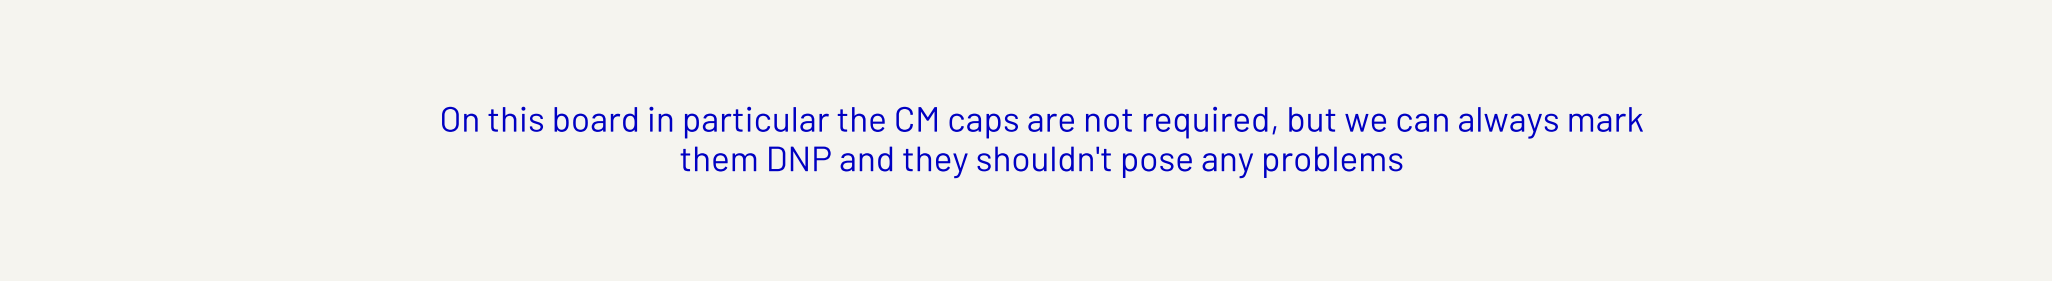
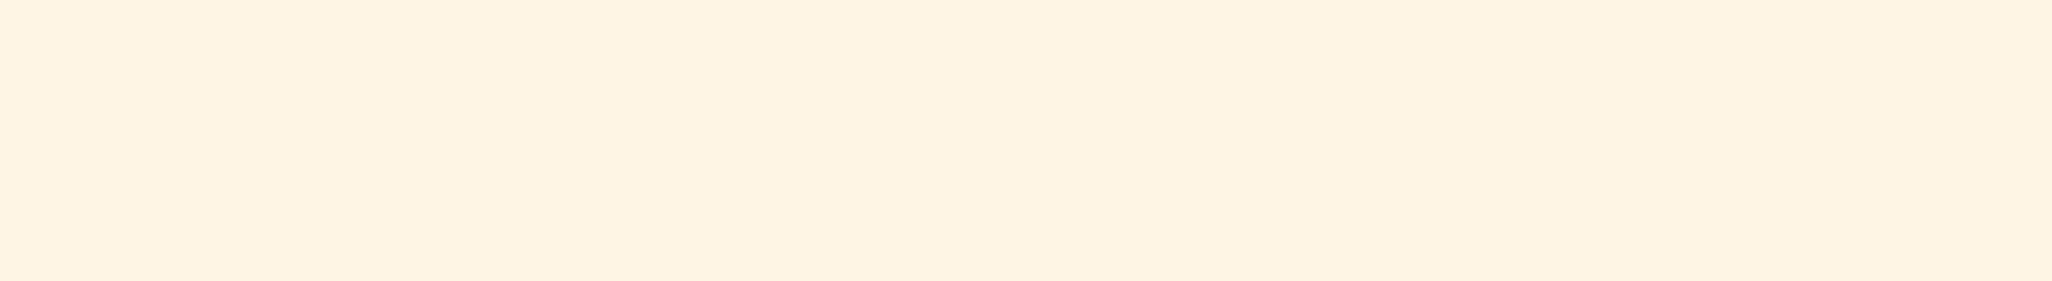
text: On this board in particular the CM caps are not required, but we can always mark (1042, 122) -> none
text: them DNP and they shouldn't pose any problems (1041, 162) -> none

